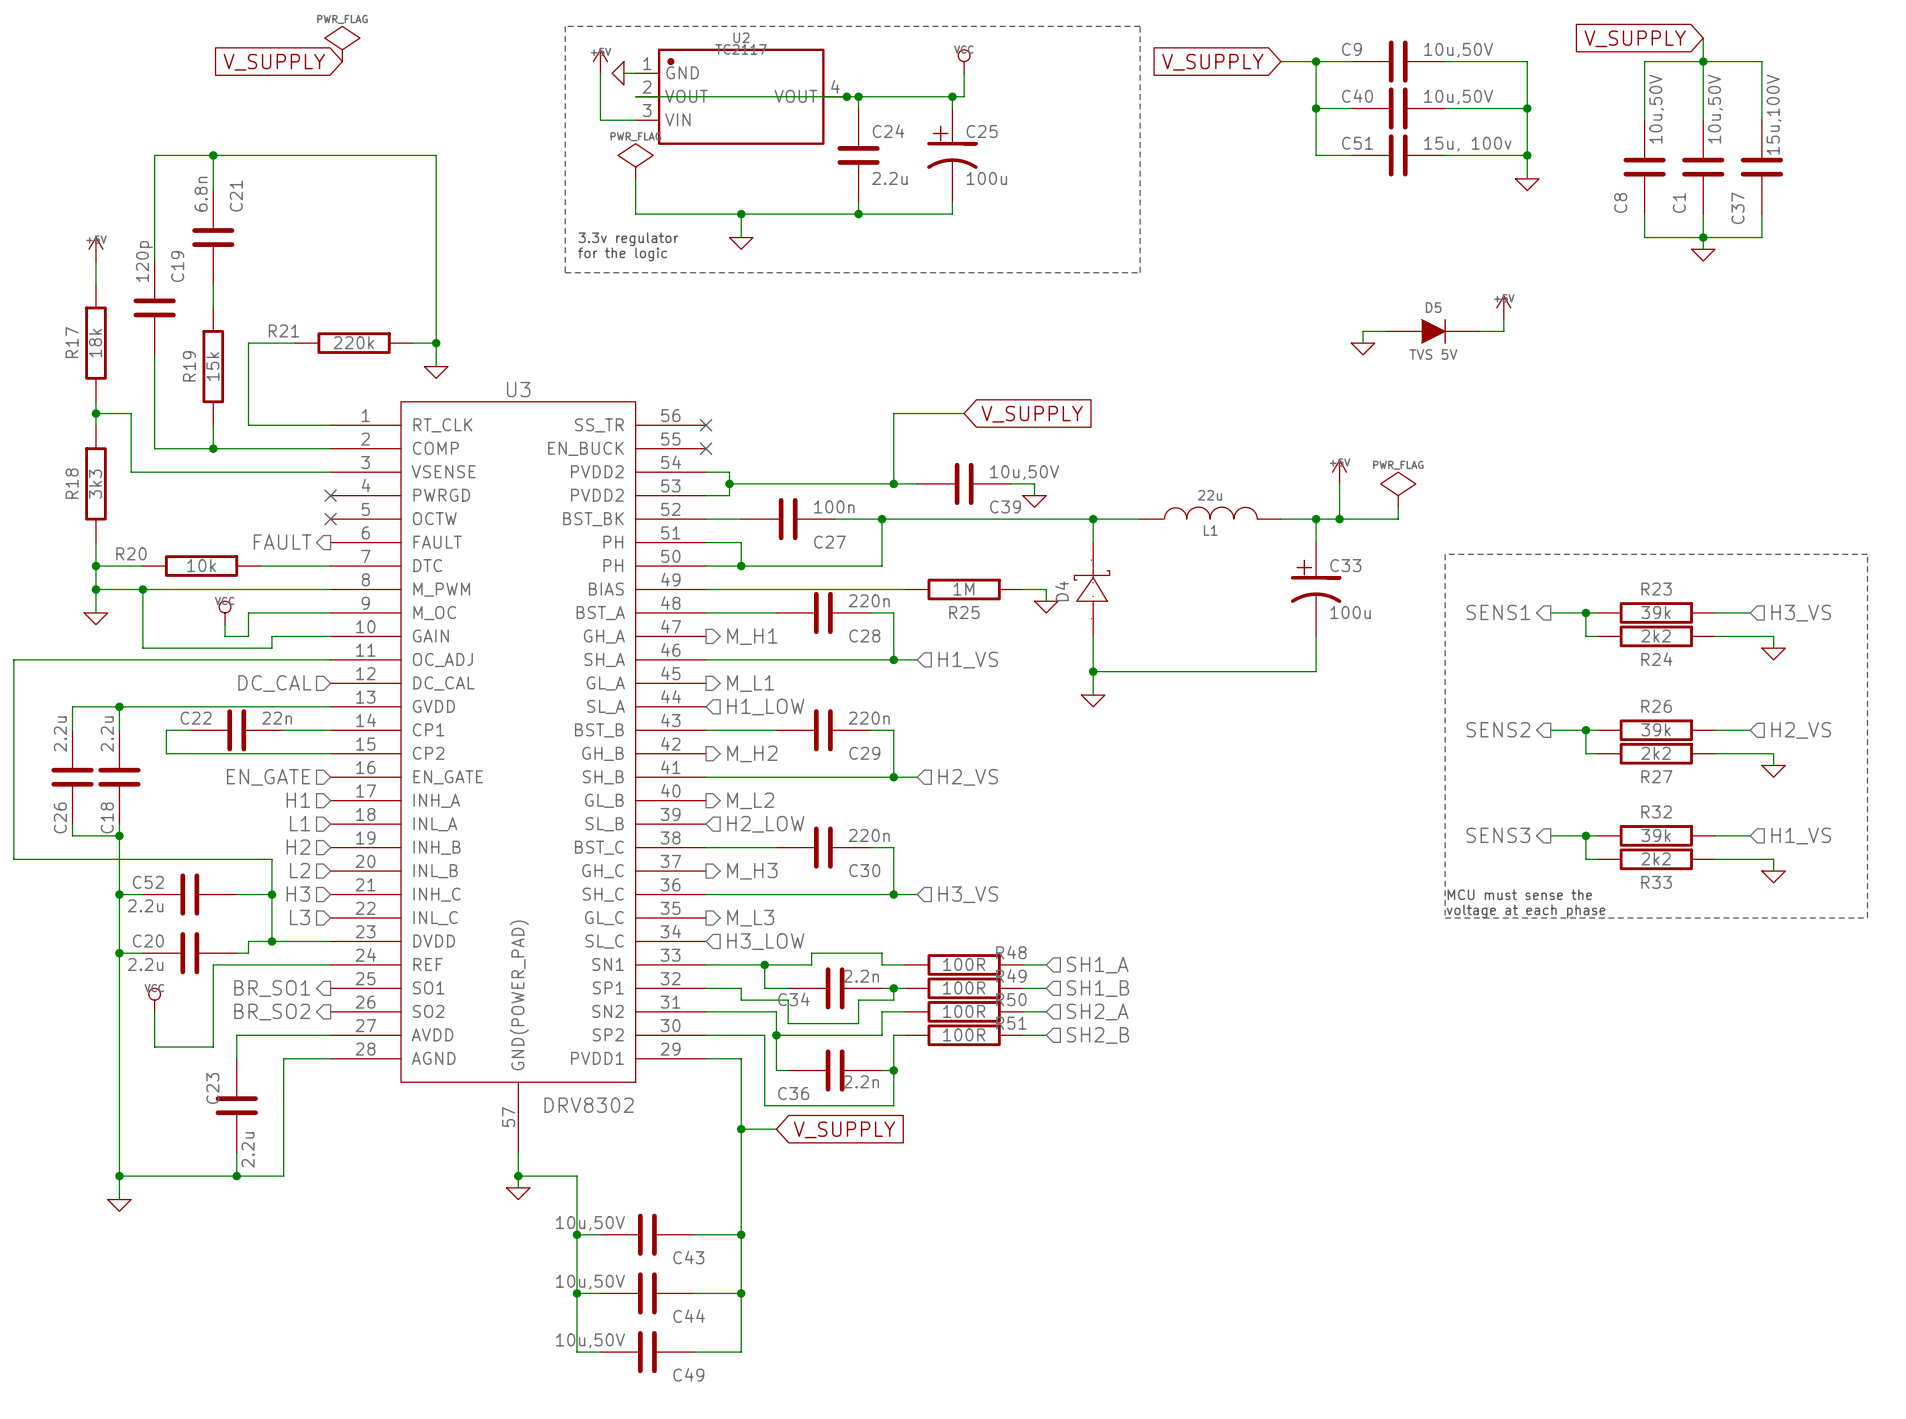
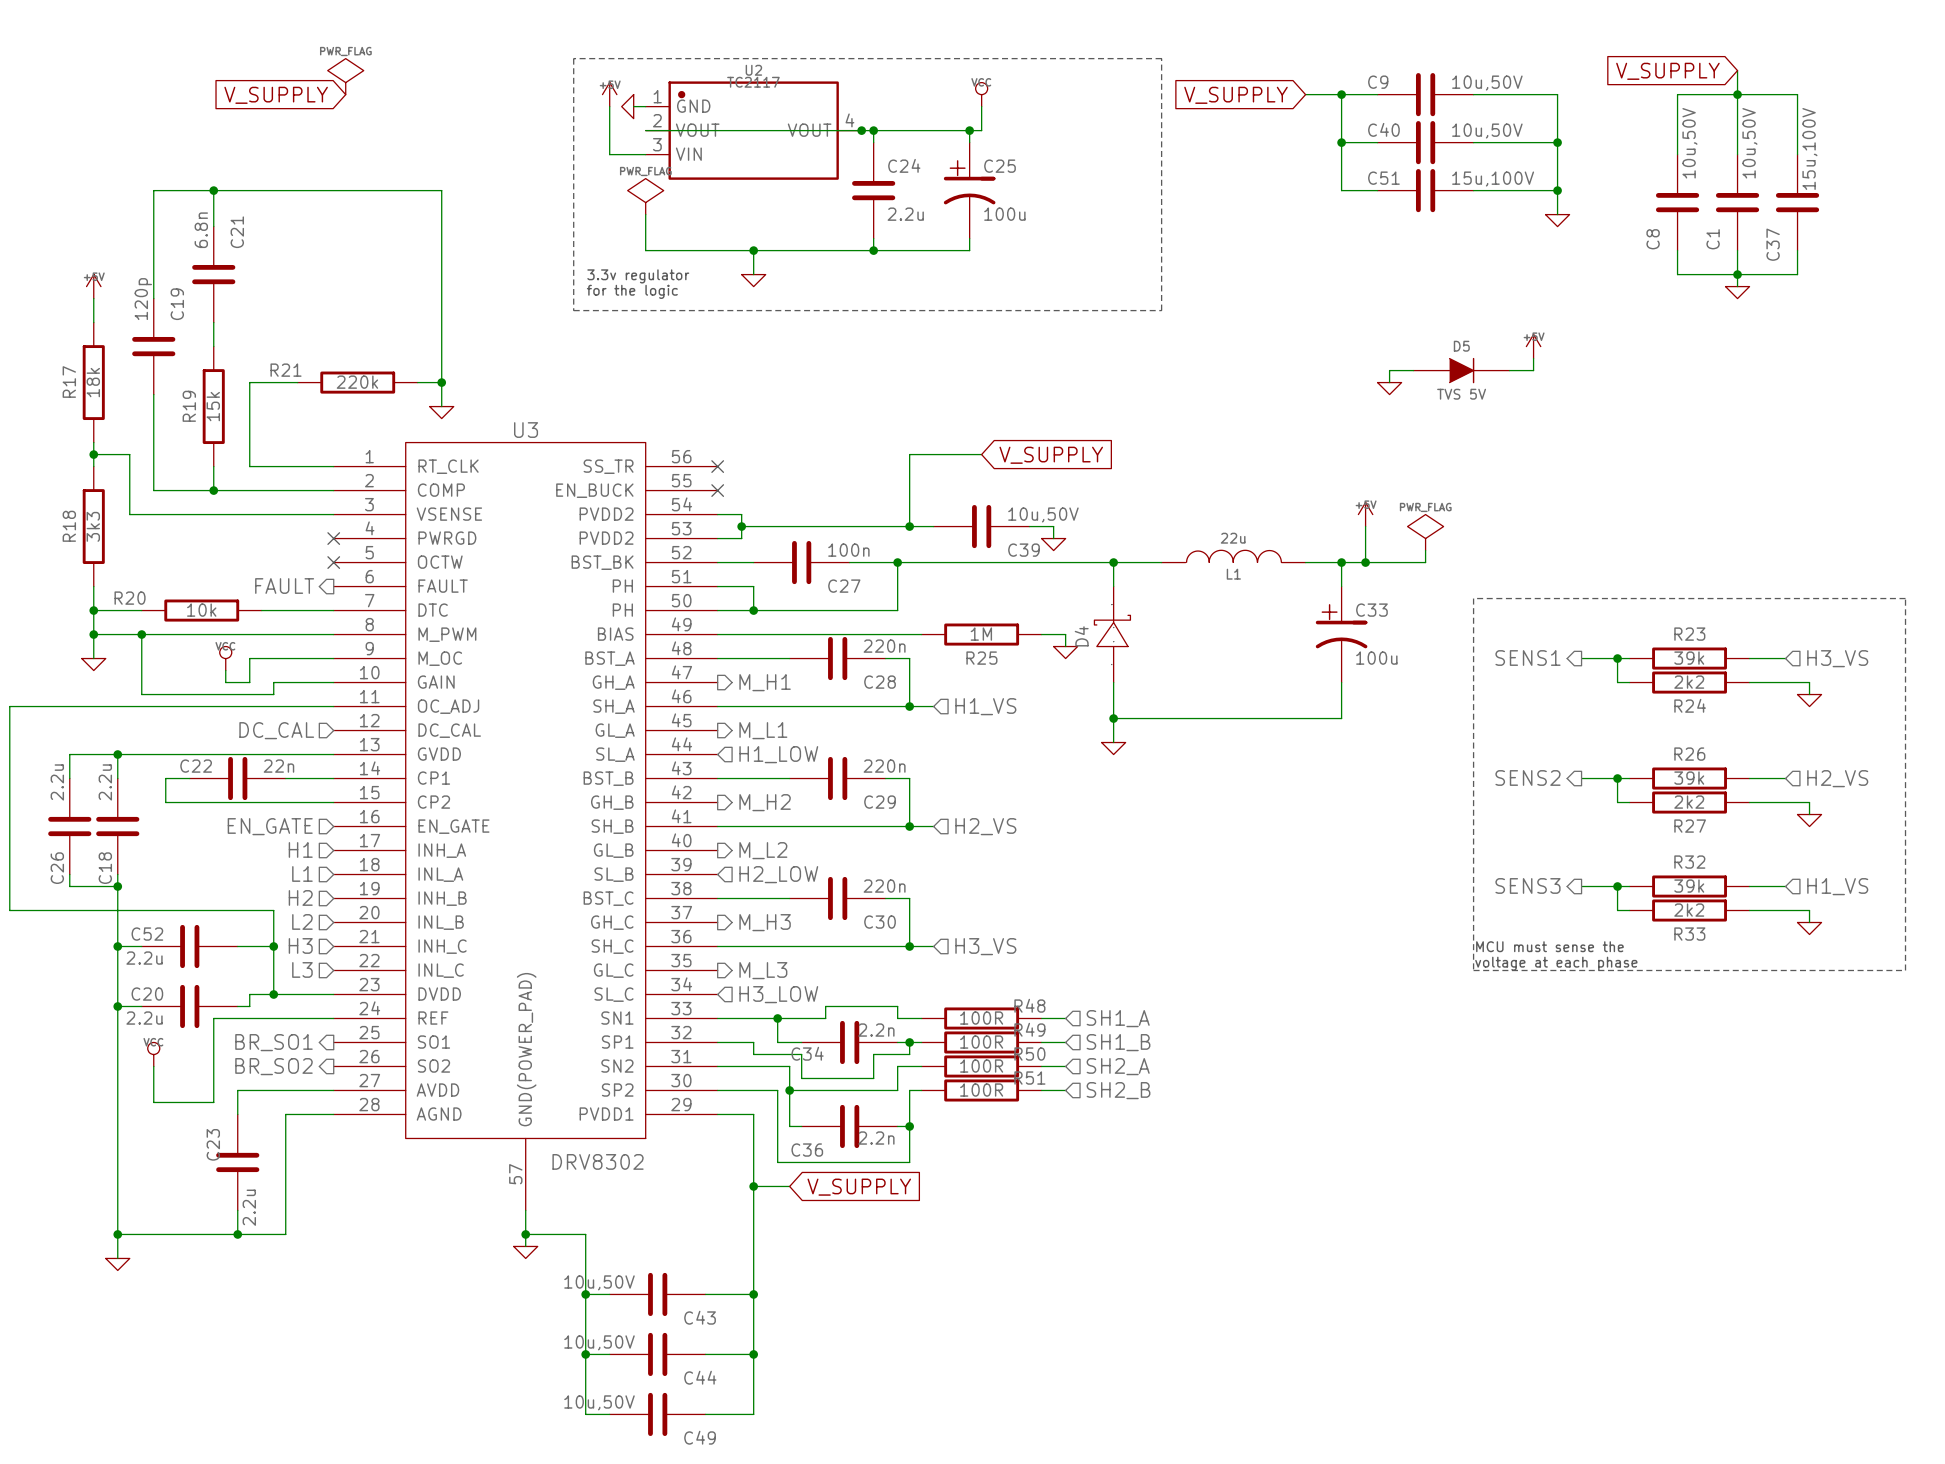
C51 value: 15u, 100v (1467, 144) -> 15u,100V (1493, 179)

